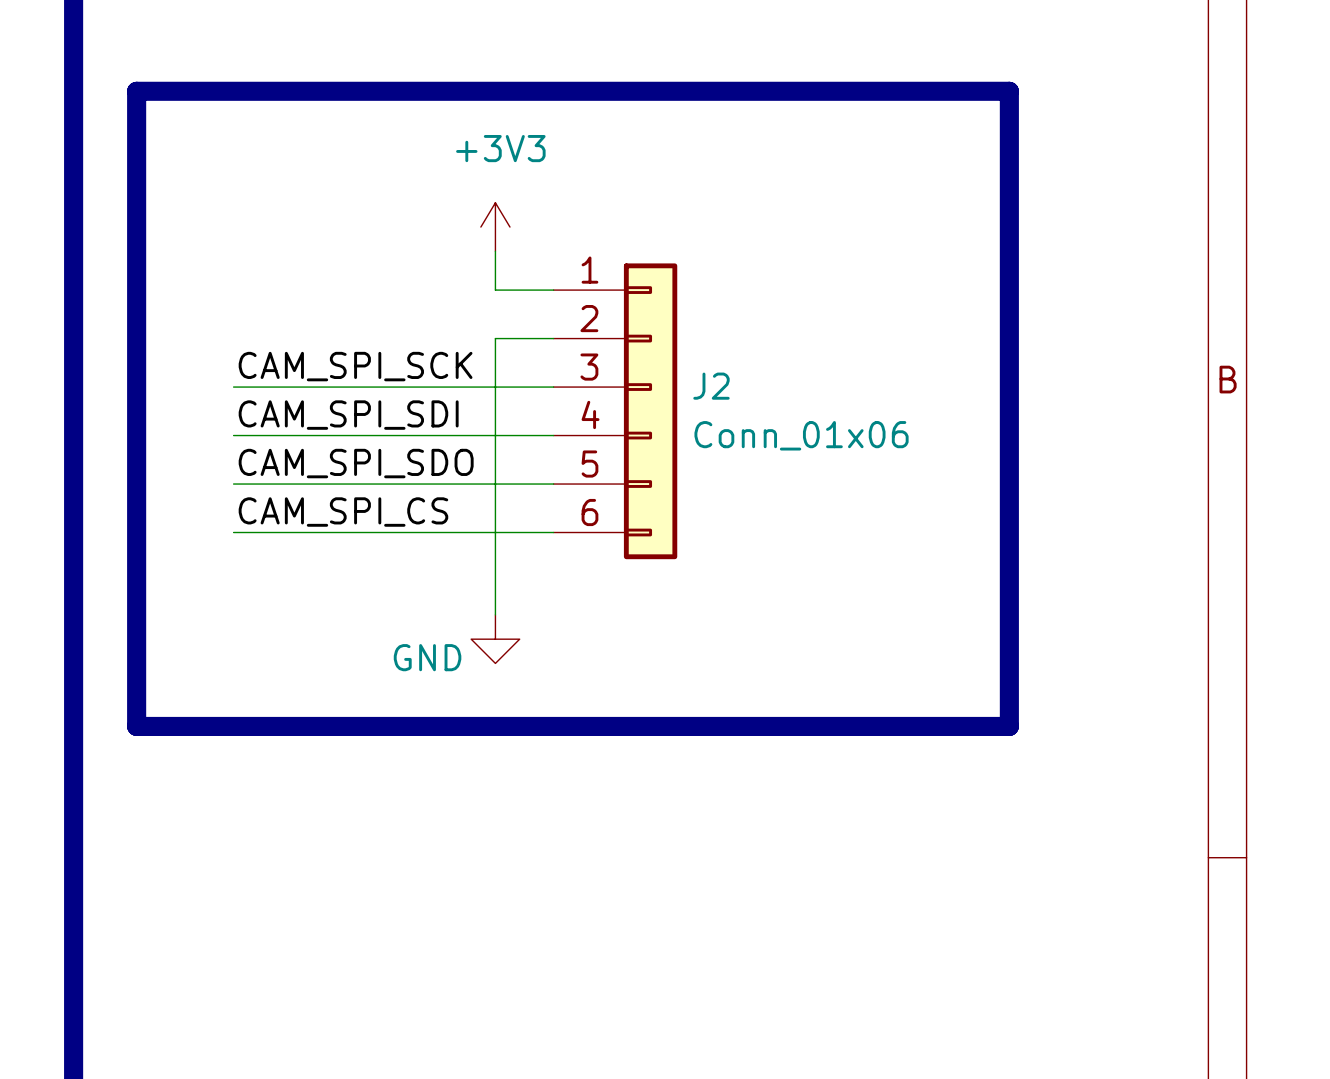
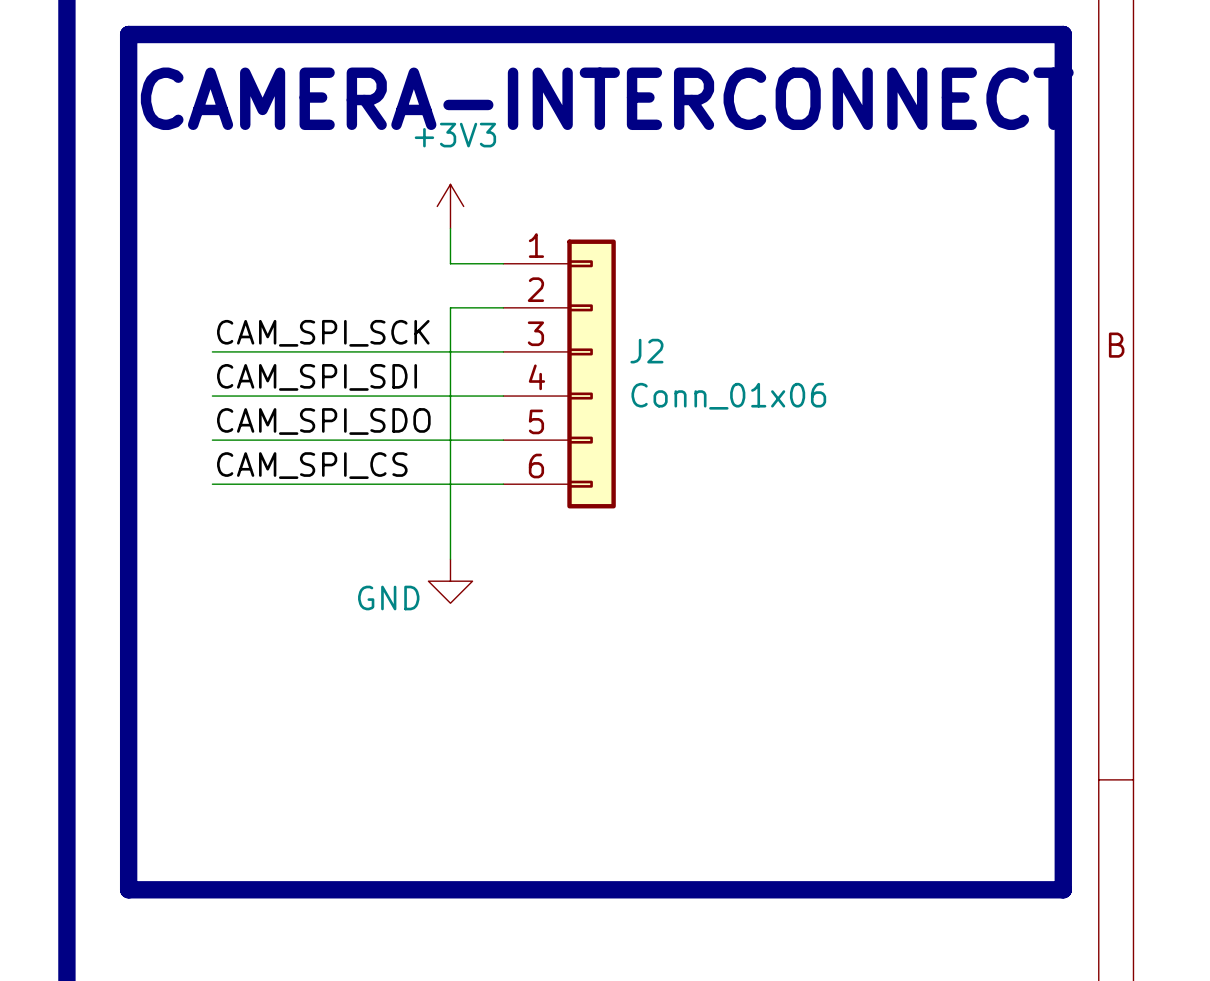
line: (136, 91) (1009, 91) (1009, 726) (136, 726) (136, 91) -> (128, 34) (128, 889) (1063, 889) (1063, 34) (128, 34)
text: none -> CAMERA-INTERCONNECT (607, 98)

